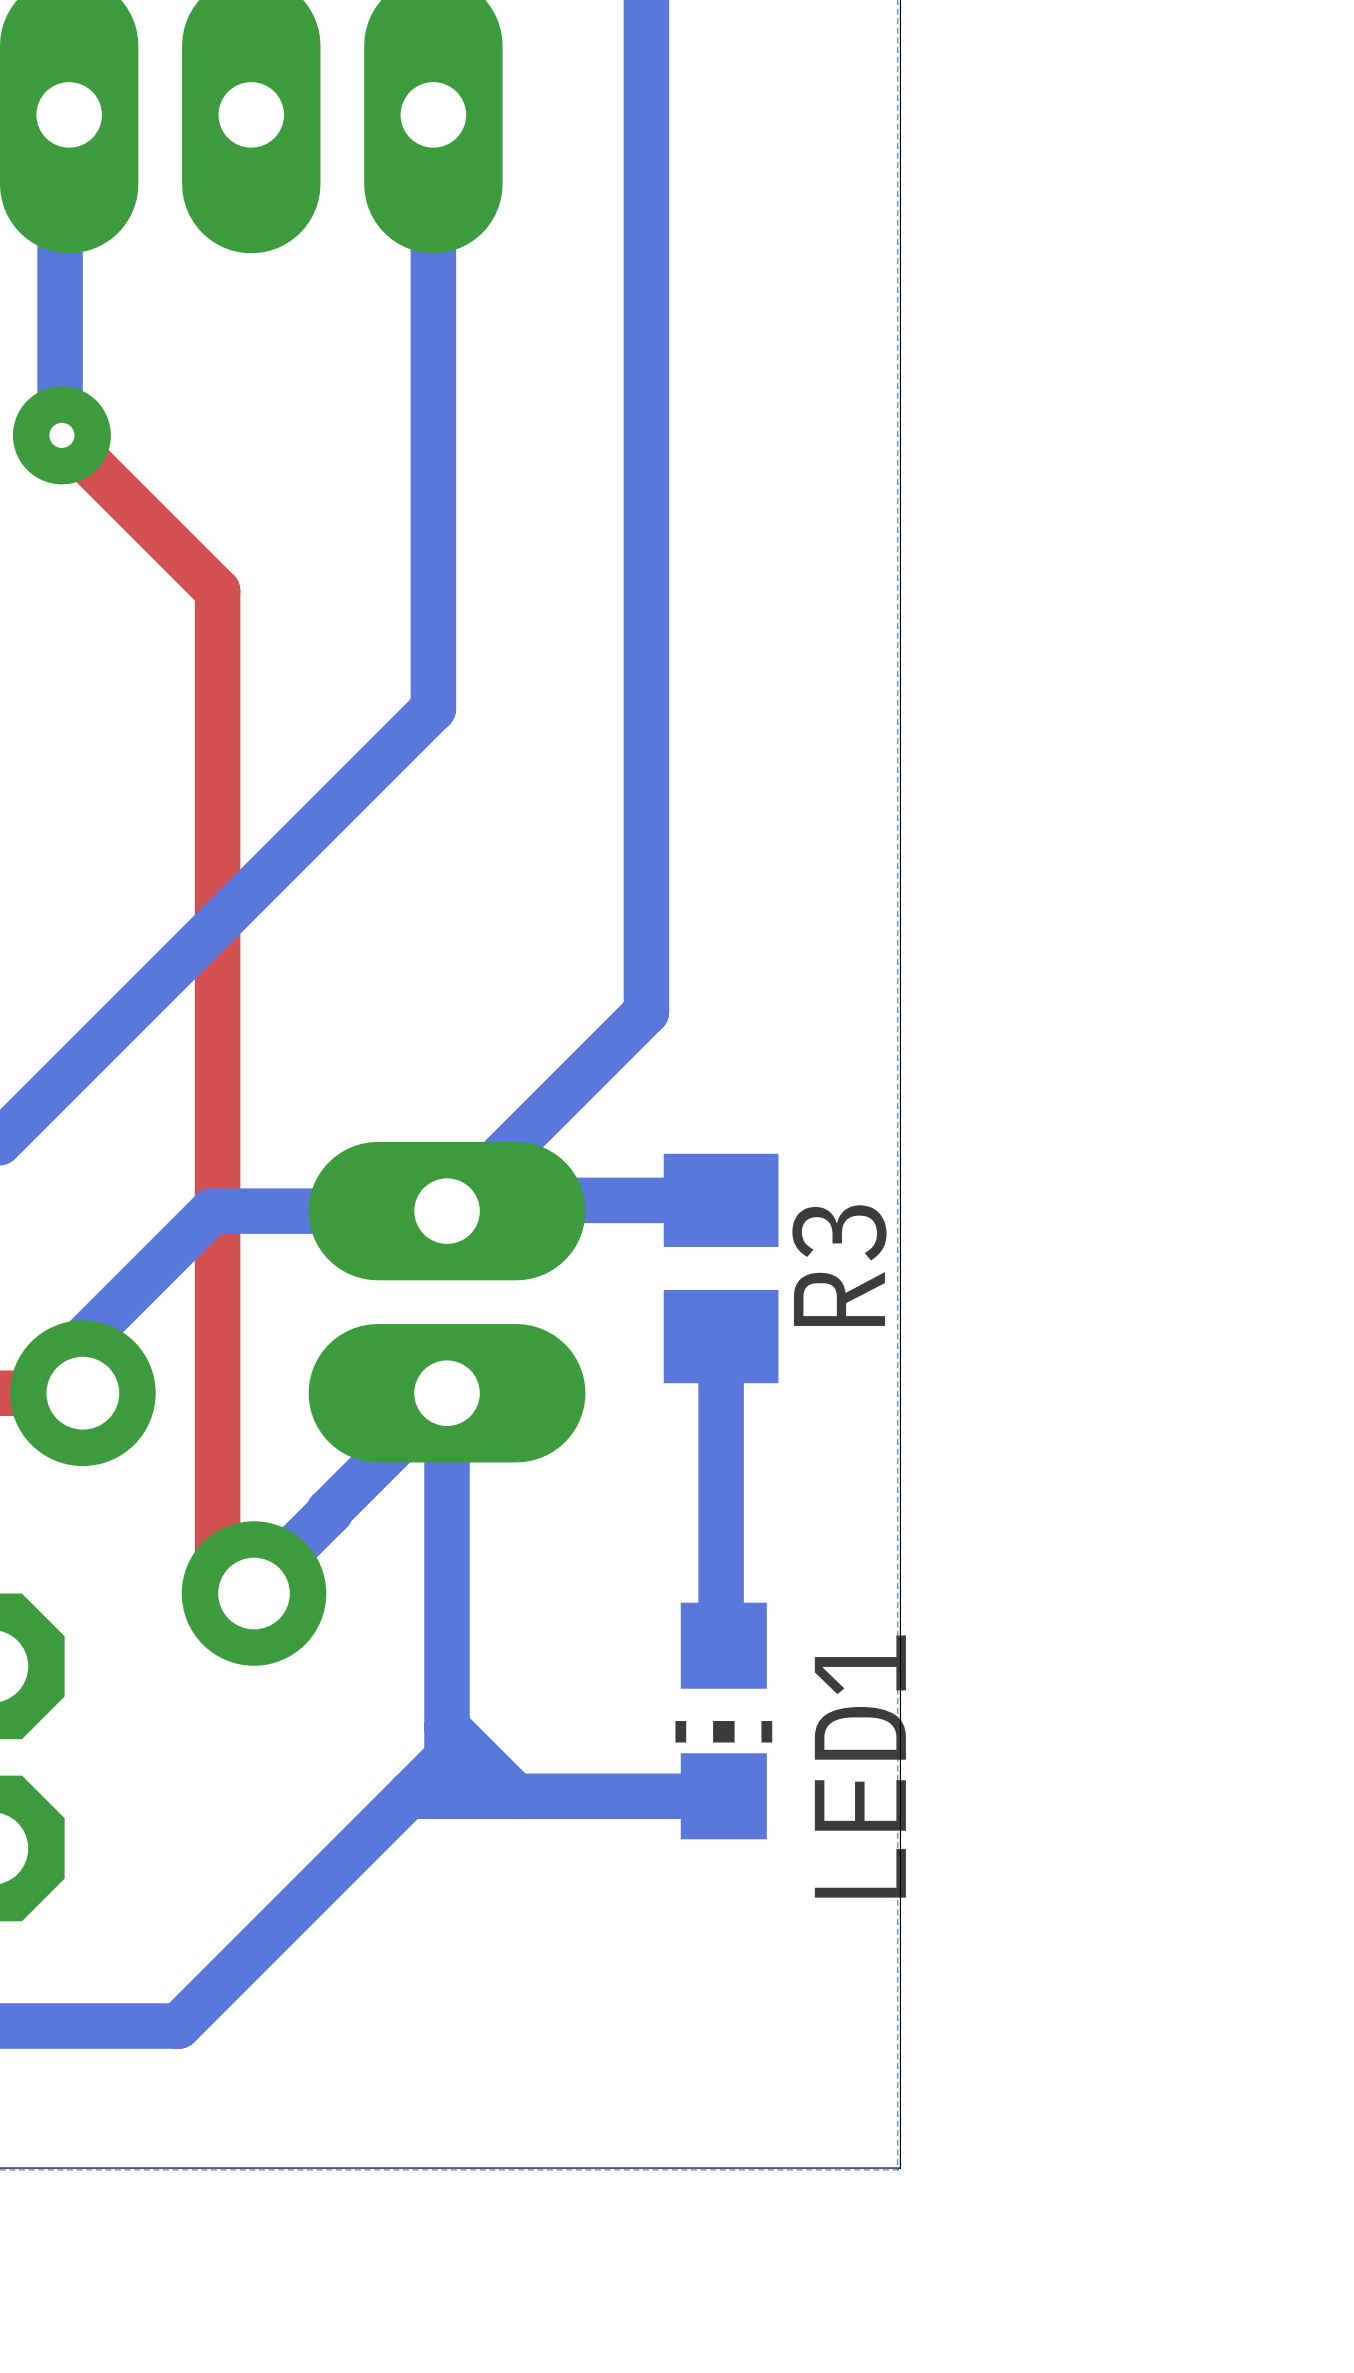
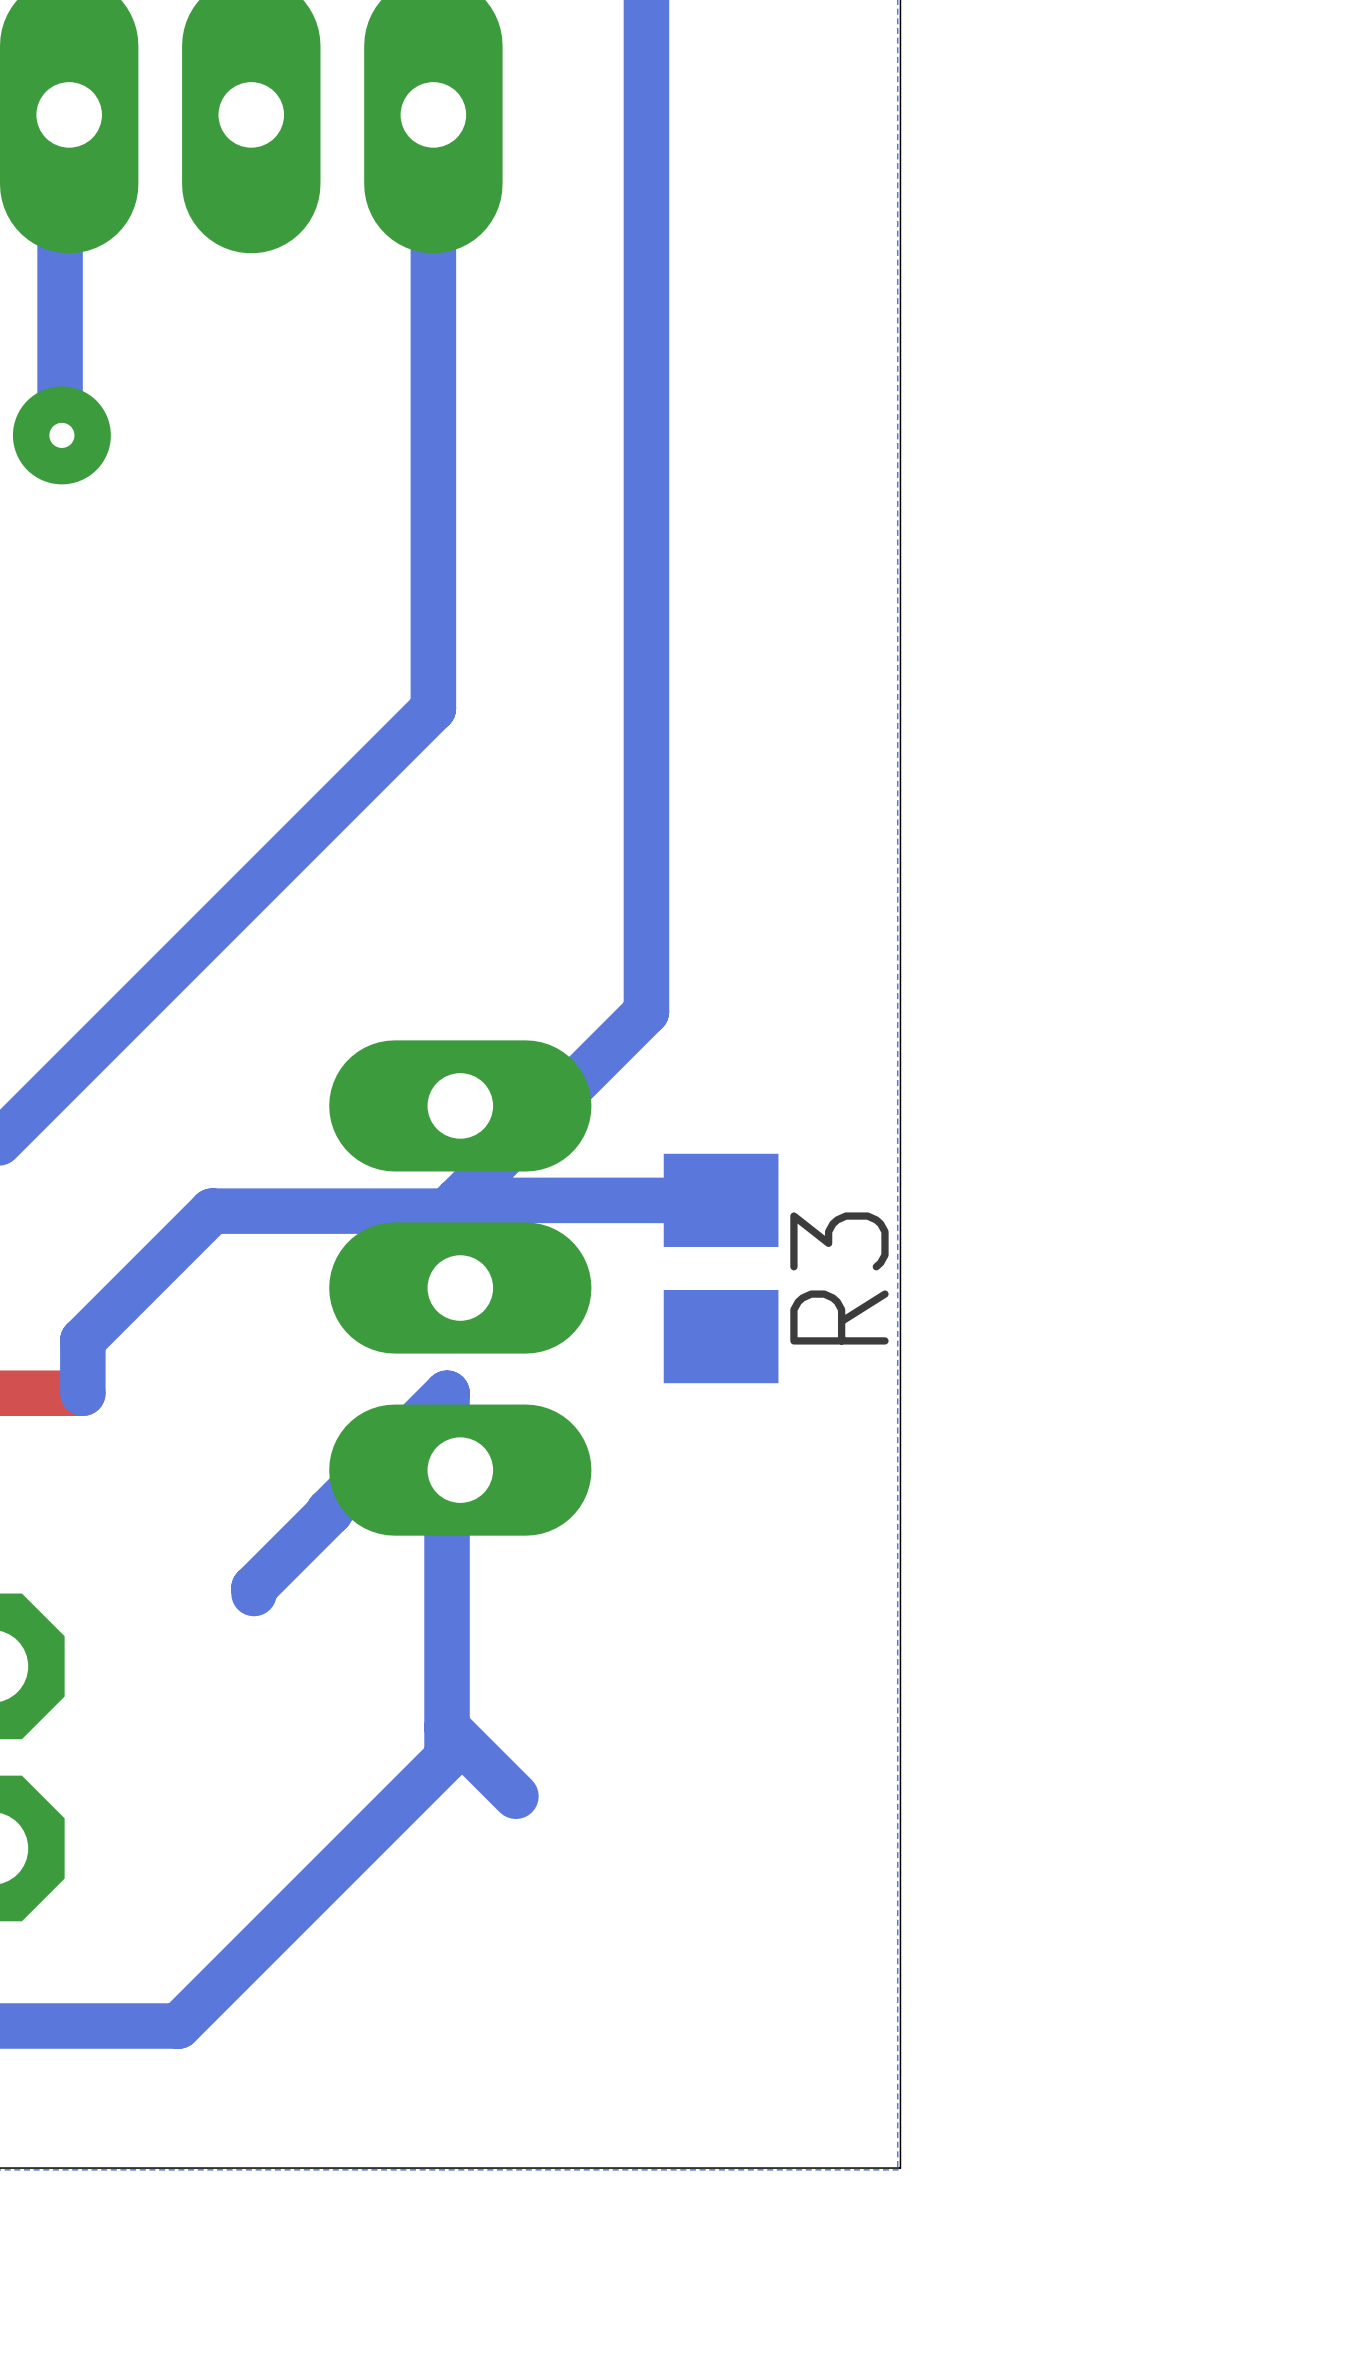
top track: (61, 435) (217, 591) (217, 1557) (254, 1593) -> none
part footprint: [308, 1141, 586, 1463] -> [329, 1040, 592, 1536]
bottom track: (721, 1336) (721, 1642) (723, 1645) -> none
via: (82, 1393) -> none
via: (254, 1593) -> none
LED1: (723, 1721) -> none
bottom track: (410, 1793) (413, 1796) (723, 1796) -> none

